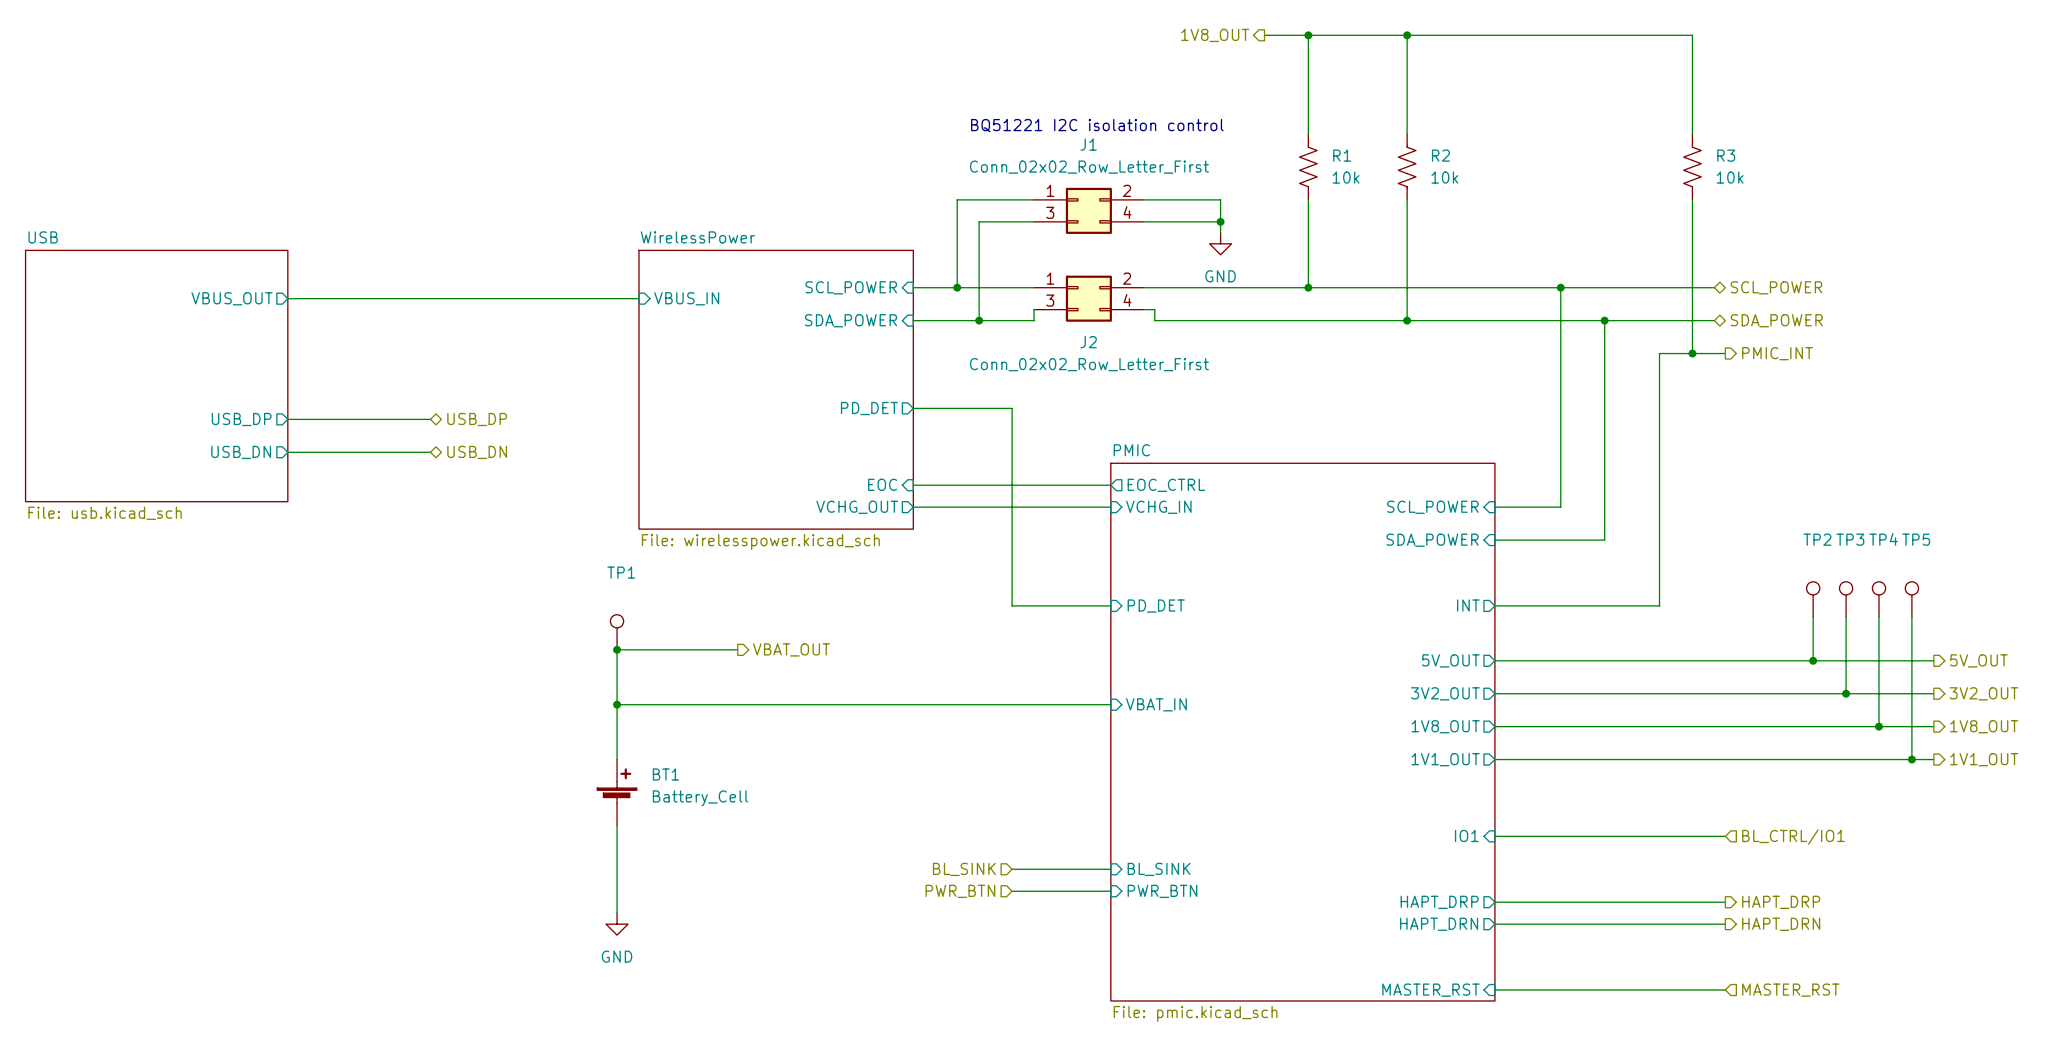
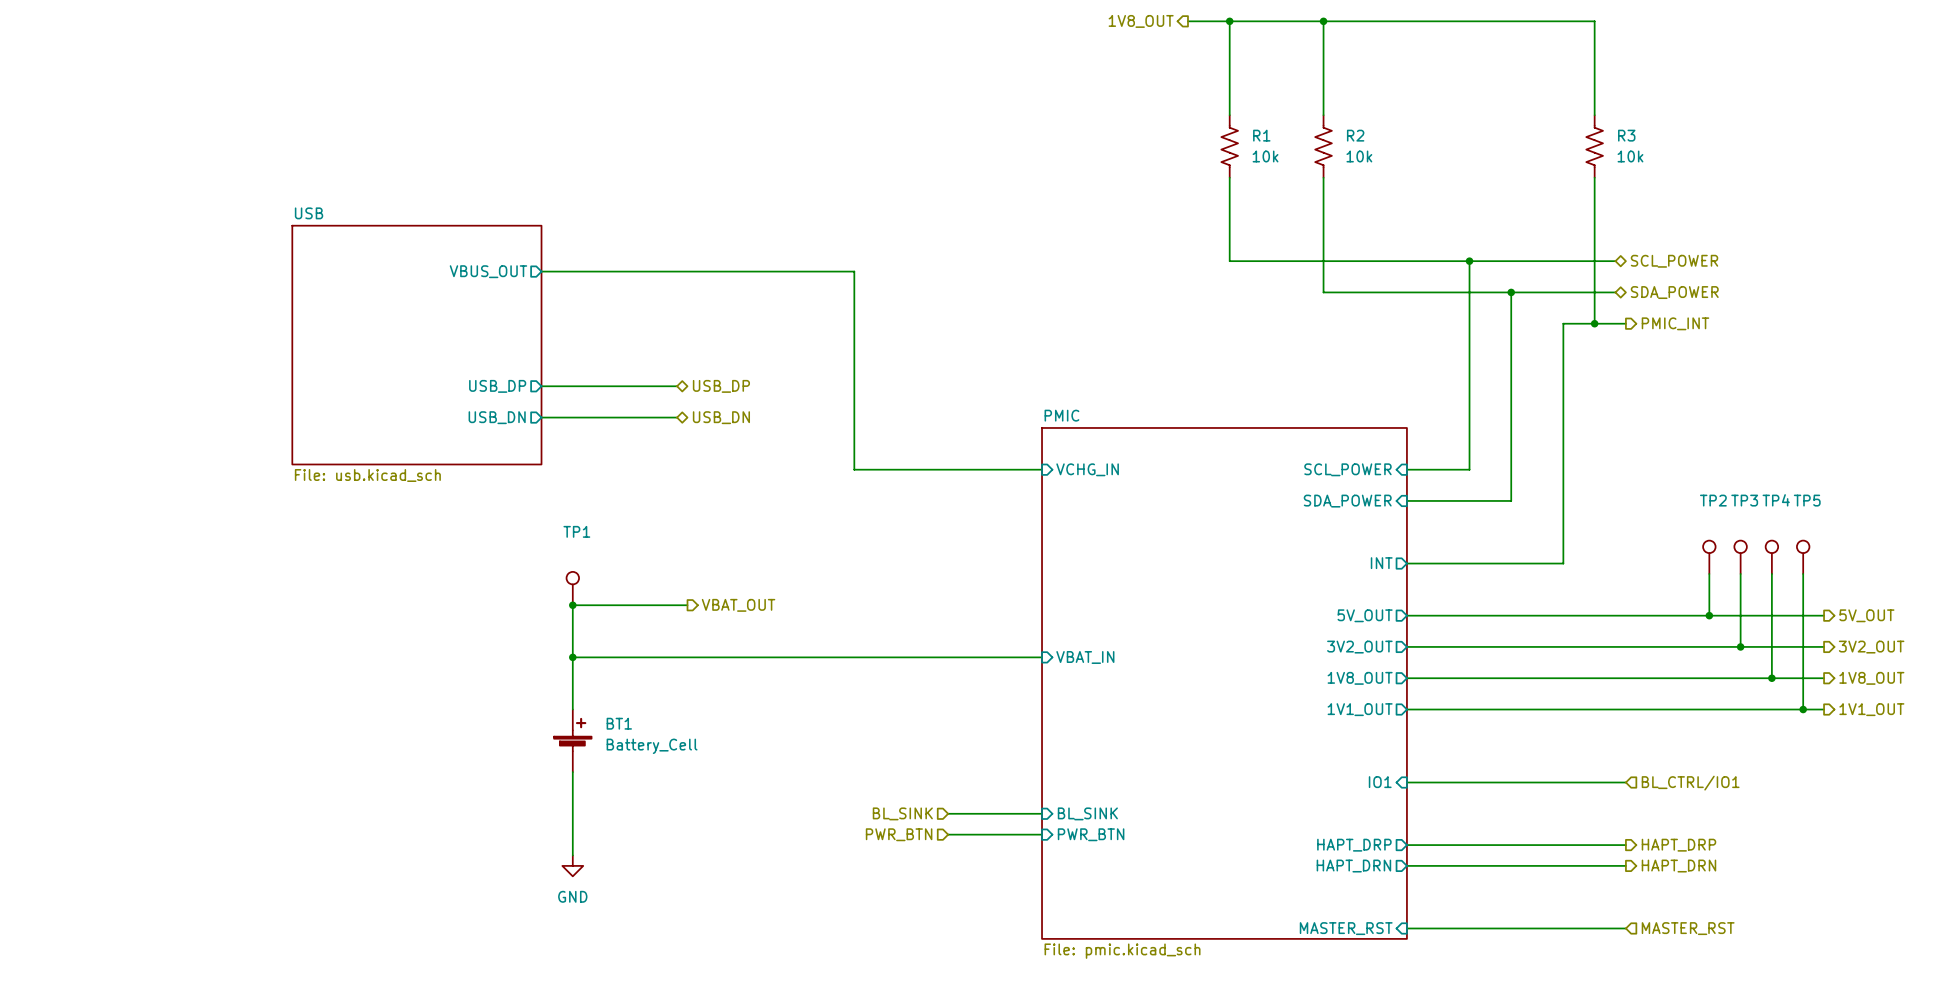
text: BQ51221 I2C isolation control (1097, 125) -> none
wire: (1034, 199) (957, 199) (957, 287) -> none
wire: (1143, 199) (1220, 199) (1220, 232) -> none
J1: Conn_02x02_Row_Letter_First (1088, 210) -> none
wire: (1034, 221) (979, 221) (979, 320) -> none
wire: (1143, 221) (1220, 221) -> none
junction: (1220, 221) -> none
power symbol: GND (1220, 243) -> none
sheet pin: SCL_POWER (851, 287) -> none
wire: (913, 287) (1034, 287) -> none
junction: (957, 287) -> none
wire: (1143, 287) (1308, 287) -> none
junction: (1308, 287) -> none
sheet pin: VBUS_OUT (232, 298) -> none
wire: (287, 298) (584, 298) -> none
sheet pin: none -> VBUS_OUT (488, 271)
wire: none -> (593, 271) (854, 271) (854, 469)
sheet pin: VBUS_IN (686, 298) -> none
J2: Conn_02x02_Row_Letter_First (1088, 298) -> none
wire: (1034, 309) (1034, 320) (913, 320) -> none
wire: (1143, 309) (1154, 309) (1154, 320) (1407, 320) -> none
sheet pin: SDA_POWER (850, 320) -> none
junction: (979, 320) -> none
junction: (1407, 320) -> none
sheet USB: File: usb.kicad_sch (156, 376) -> none
sheet USB: none -> File: usb.kicad_sch (416, 345)
sheet WirelessPower: File: wirelesspower.kicad_sch (776, 389) -> none
sheet pin: PD_DET (869, 408) -> none
wire: (913, 408) (1012, 408) (1012, 605) (1110, 605) -> none
sheet pin: USB_DP (241, 419) -> none
wire: (287, 419) (430, 419) -> none
hierarchical label: USB_DP (477, 419) -> none
sheet pin: none -> USB_DP (497, 386)
wire: none -> (541, 386) (677, 386)
hierarchical label: none -> USB_DP (721, 386)
sheet pin: USB_DN (241, 452) -> none
wire: (287, 452) (430, 452) -> none
hierarchical label: USB_DN (477, 452) -> none
sheet pin: none -> USB_DN (497, 417)
wire: none -> (541, 417) (677, 417)
hierarchical label: none -> USB_DN (721, 417)
sheet pin: EOC (882, 484) -> none
wire: (913, 485) (1110, 485) -> none
sheet pin: EOC_CTRL (1166, 485) -> none
sheet pin: VCHG_OUT (857, 507) -> none
sheet pin: PD_DET (1156, 606) -> none

